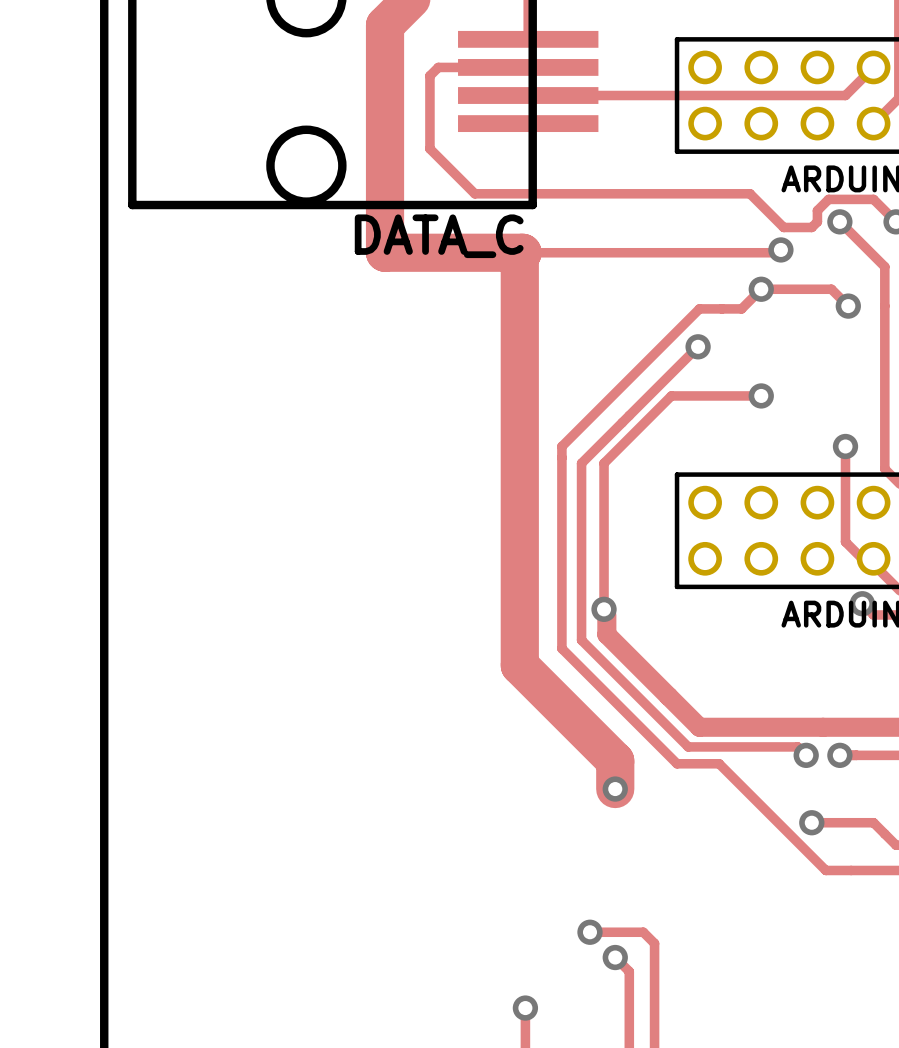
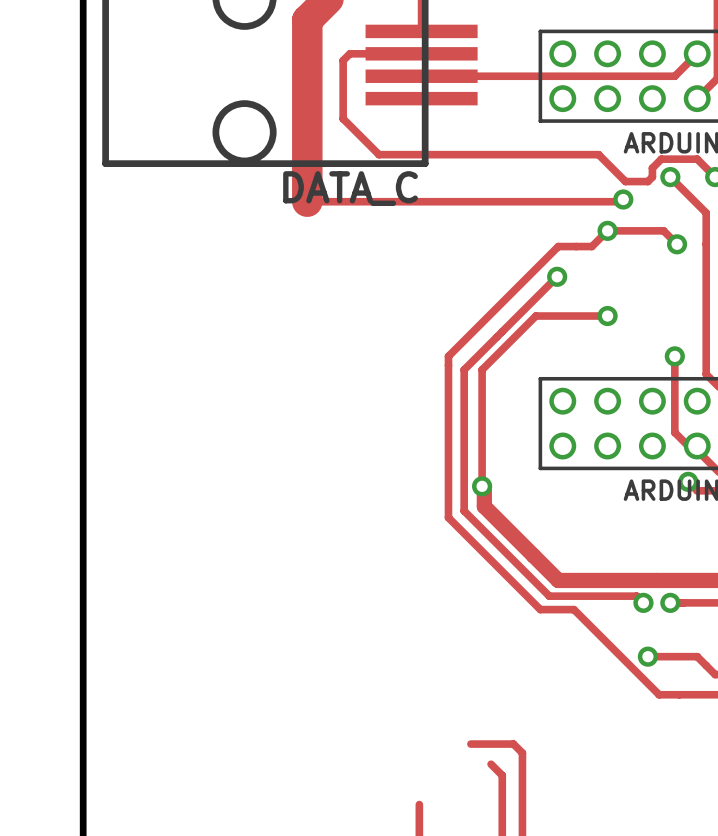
track: (385, 252) (522, 252) (519, 255) (519, 665) (615, 760) (615, 789) -> none
via: (615, 789) -> none
via: (589, 932) -> none
via: (615, 957) -> none
via: (525, 1008) -> none

